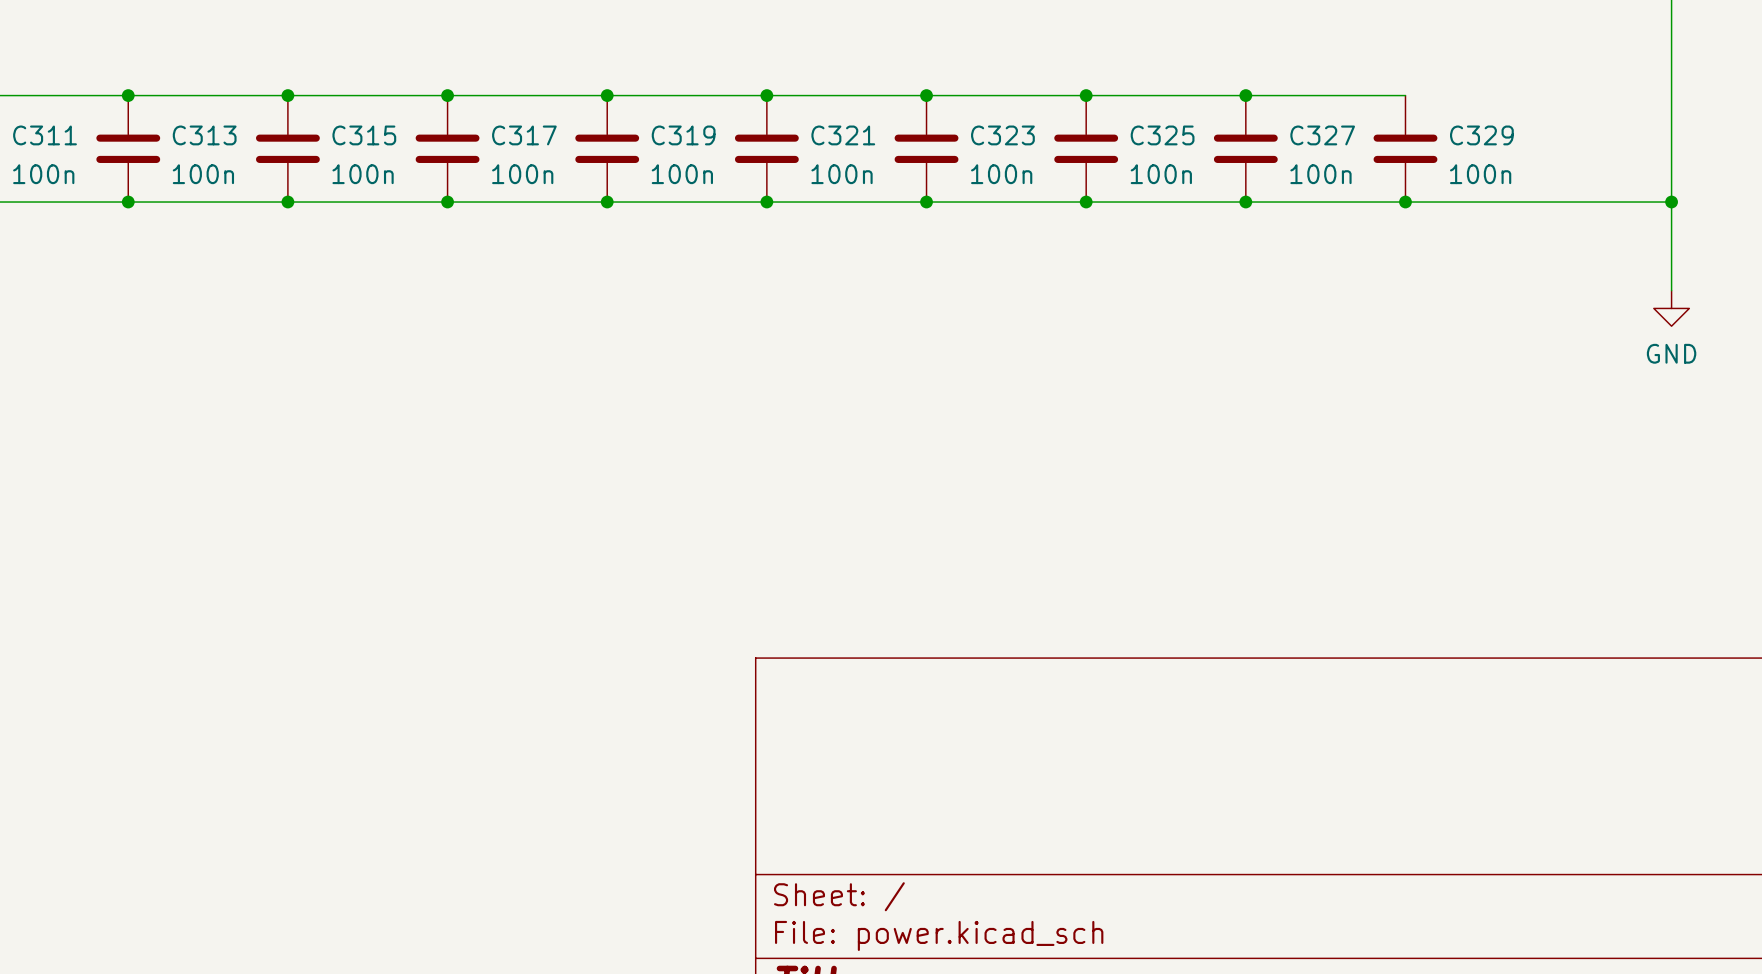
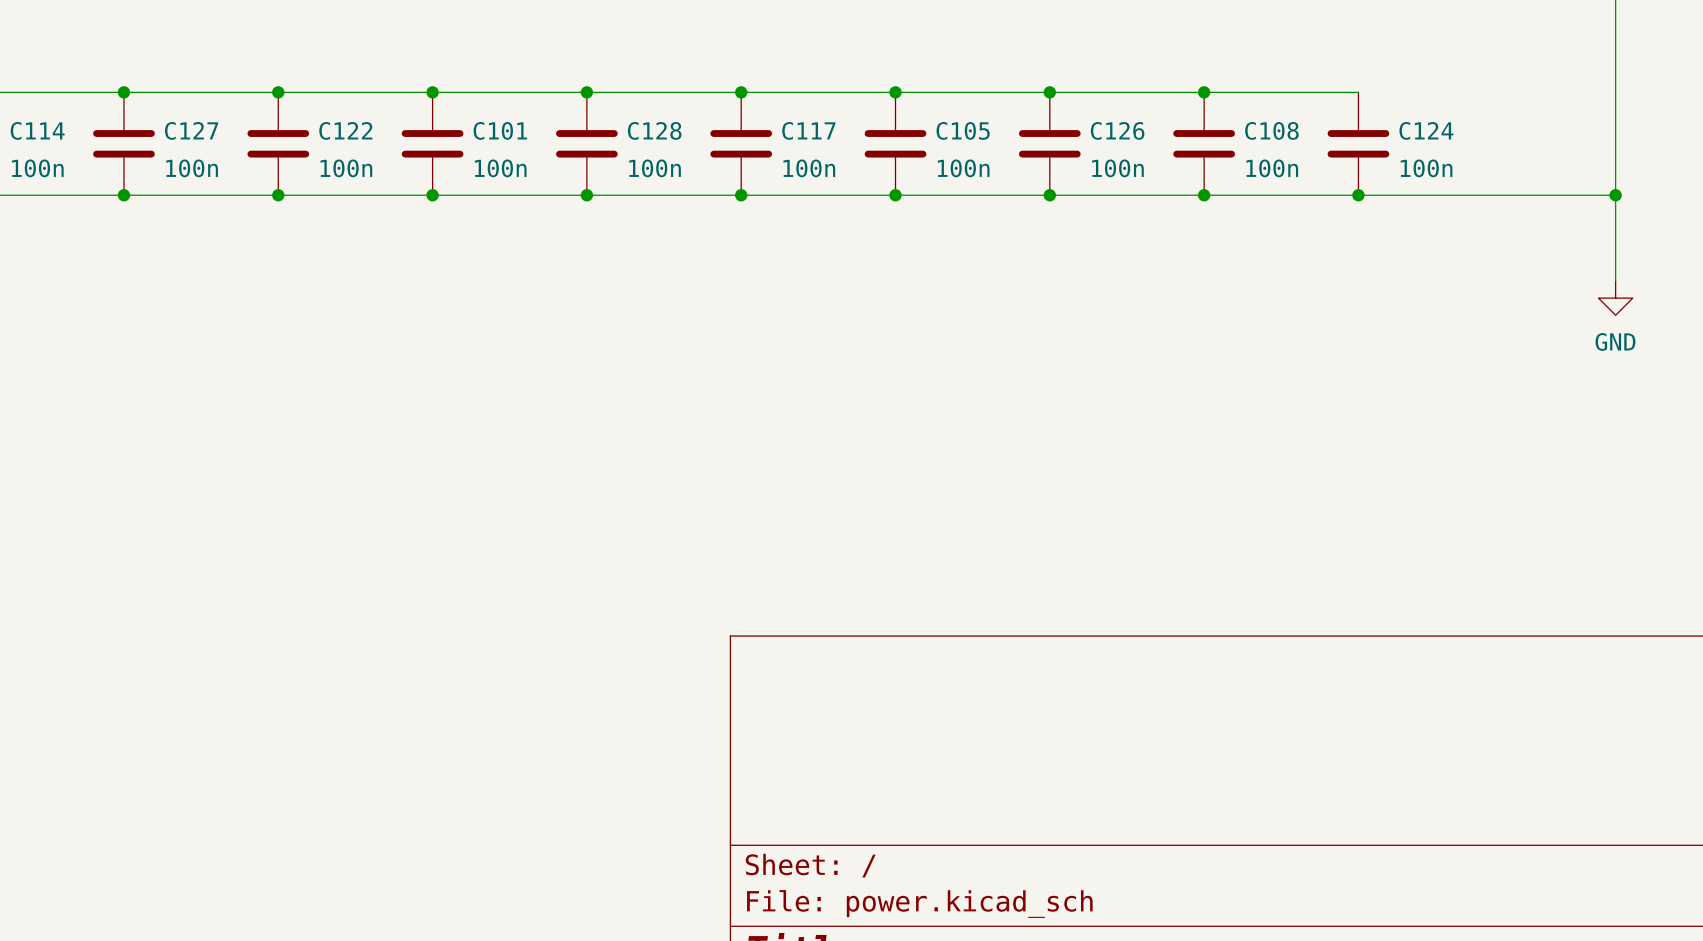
C311 name: C311 (45, 135) -> C114 (37, 130)
C313 name: C313 (204, 135) -> C127 (191, 130)
C315 name: C315 (364, 135) -> C122 (345, 130)
C317 name: C317 (524, 135) -> C101 (500, 130)
C319 name: C319 (683, 135) -> C128 (654, 130)
C321 name: C321 (843, 135) -> C117 (808, 130)
C323 name: C323 (1002, 135) -> C105 (963, 130)
C325 name: C325 (1162, 135) -> C126 (1117, 130)
C327 name: C327 (1322, 135) -> C108 (1271, 130)
C329 name: C329 (1481, 135) -> C124 (1426, 130)

